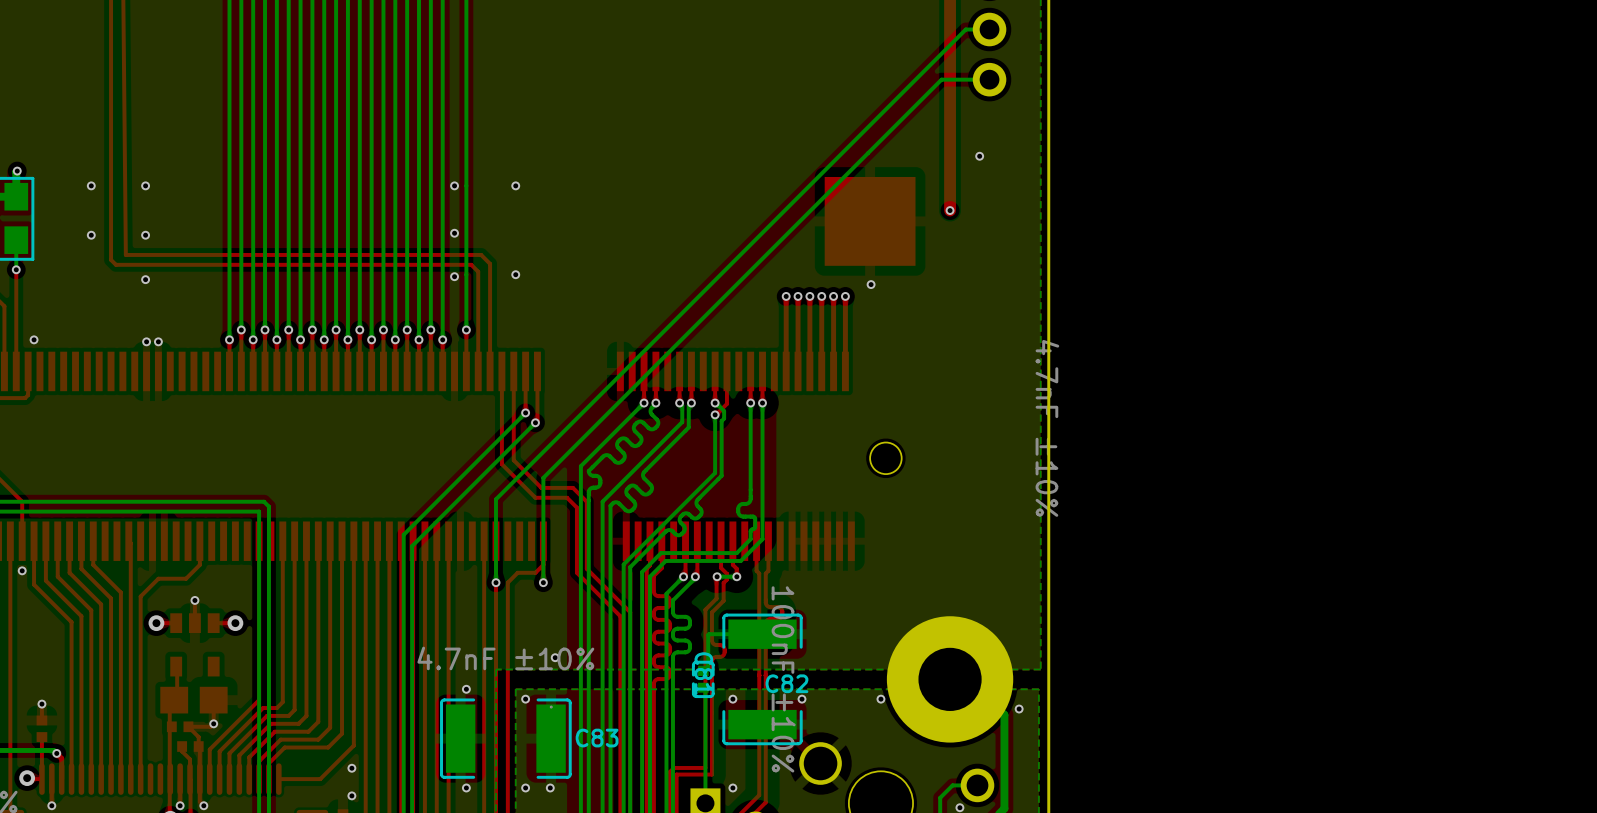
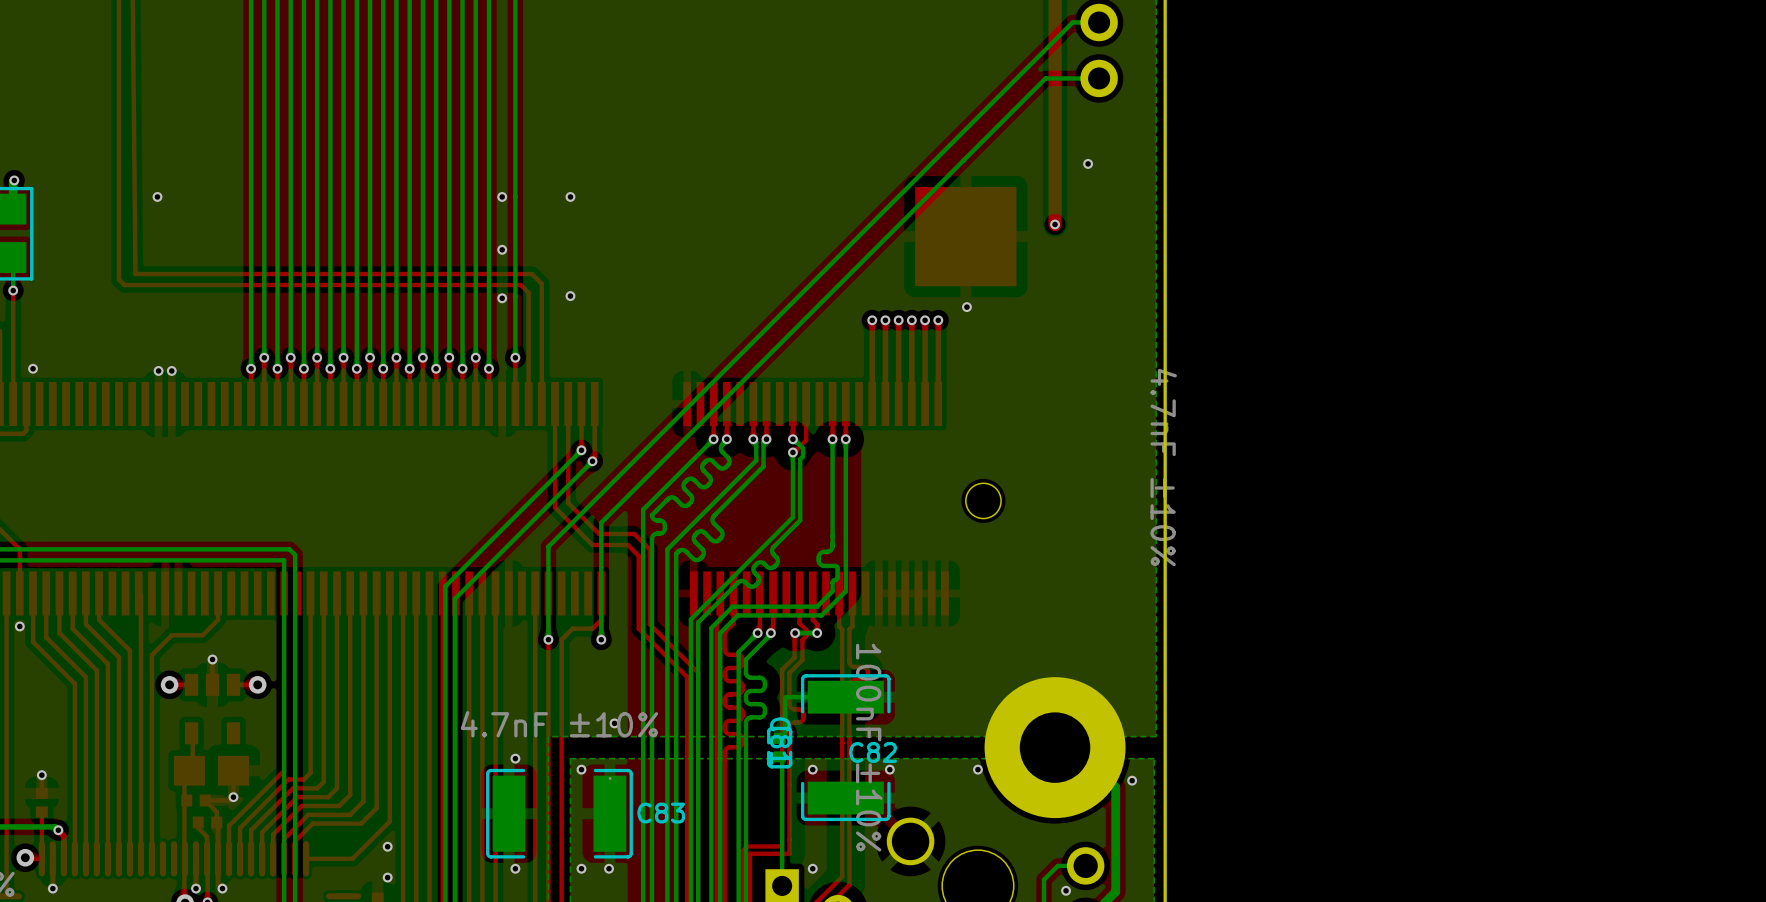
via: (91, 185) -> none
via: (91, 235) -> none
via: (145, 235) -> none
via: (145, 279) -> none

